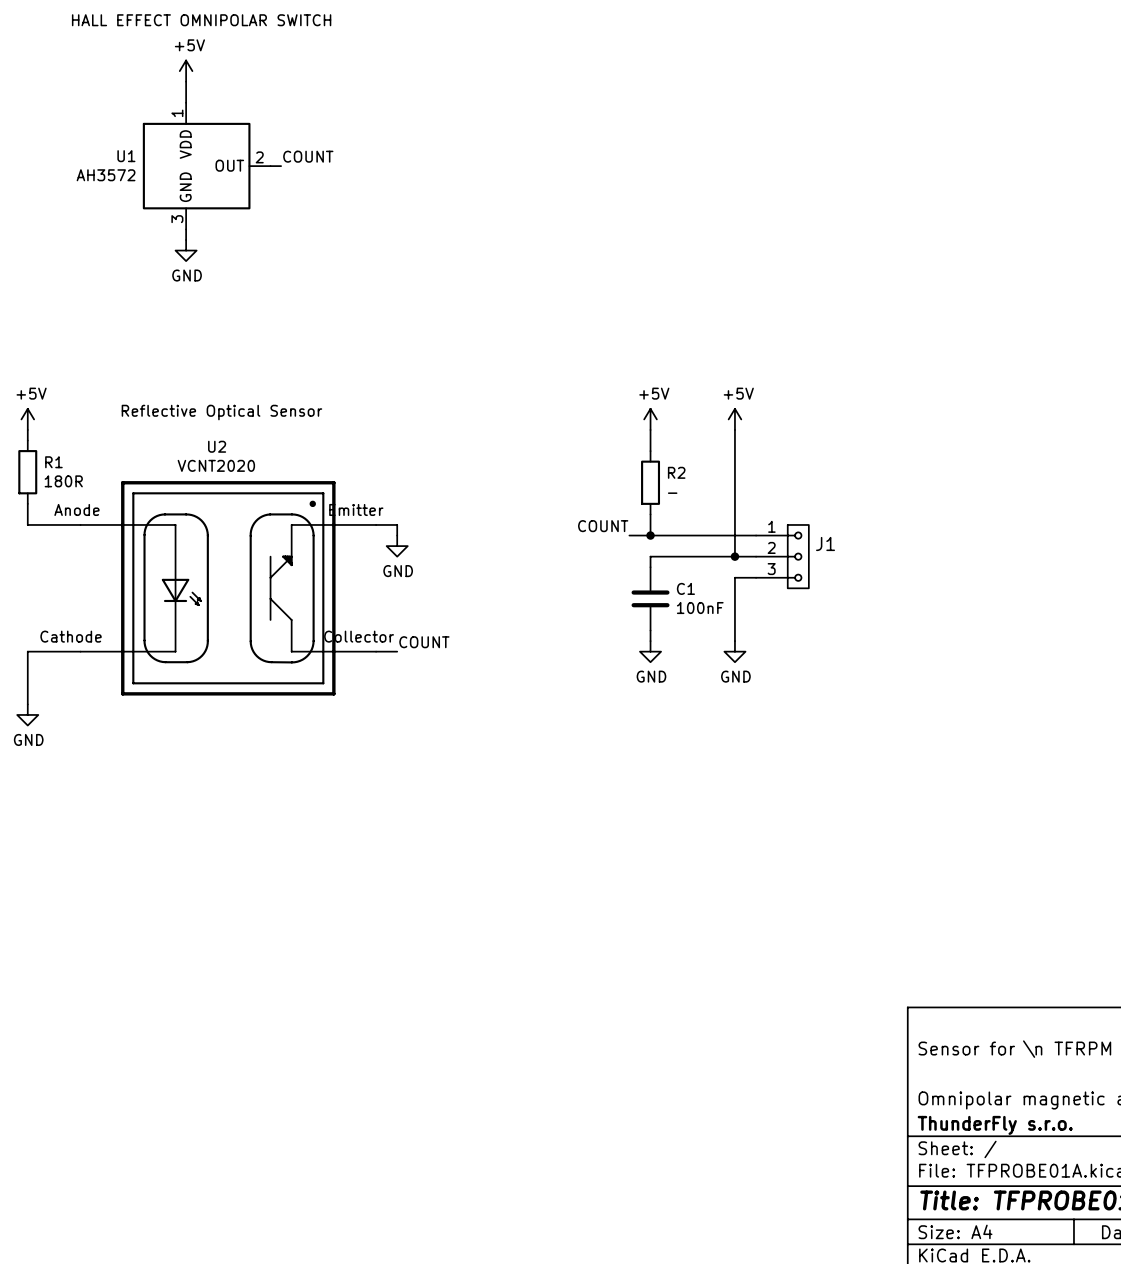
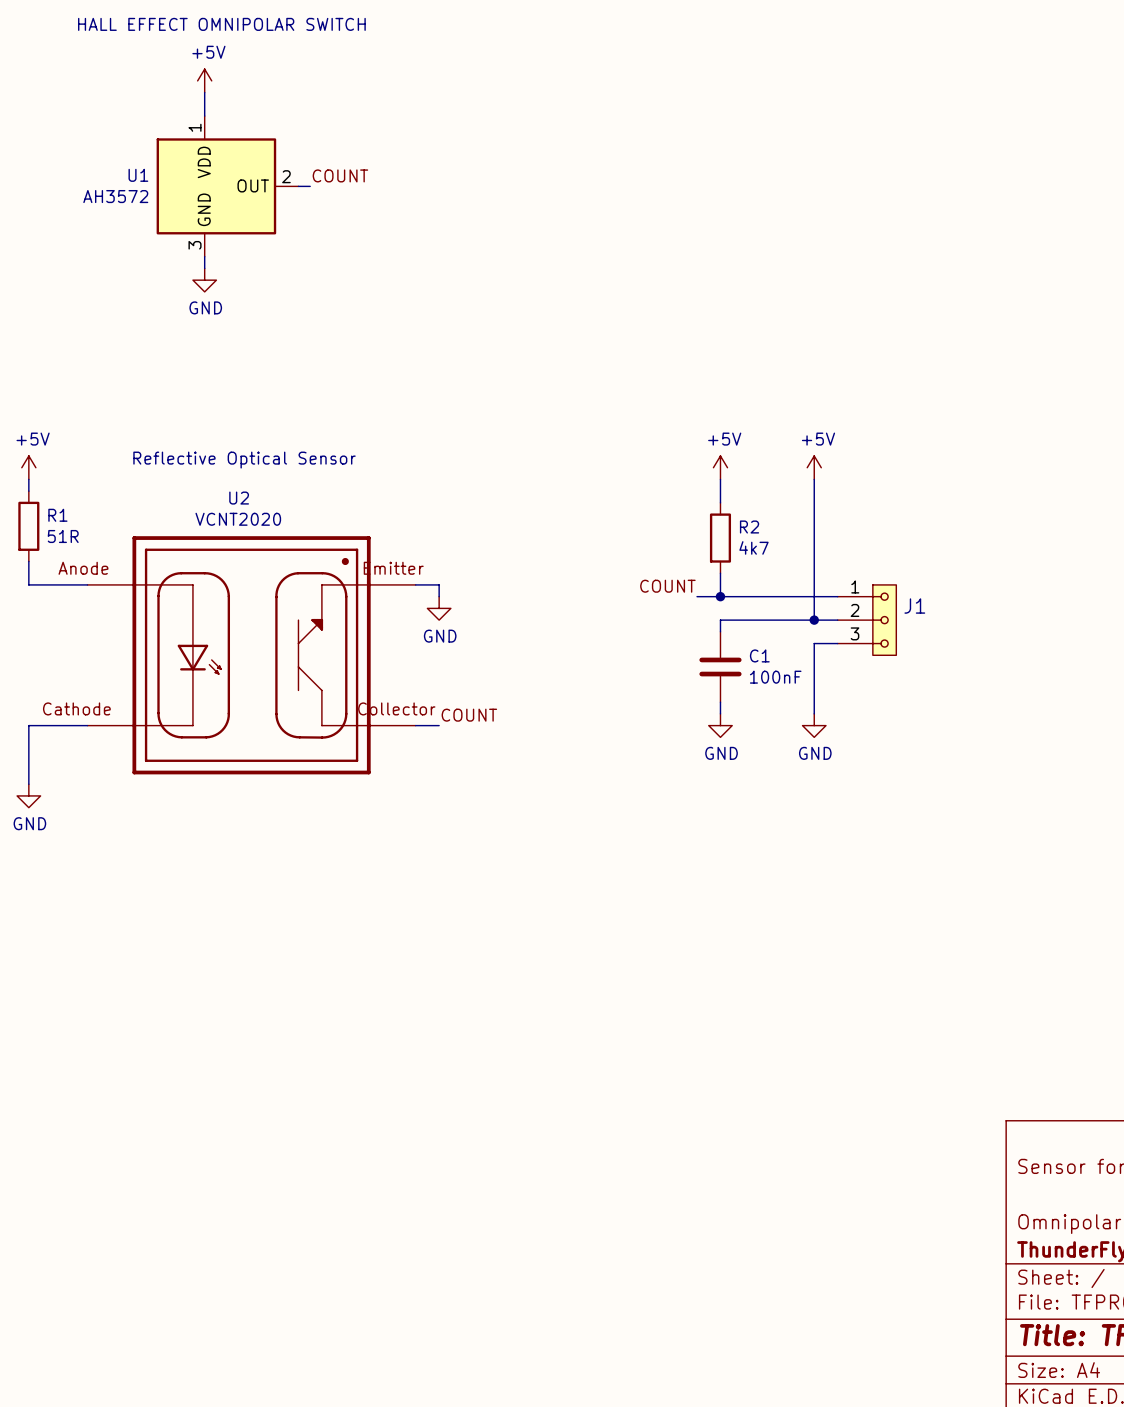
R1 value: 180R (63, 481) -> 51R (63, 536)
R2 value: - (672, 493) -> 4k7 (754, 547)

